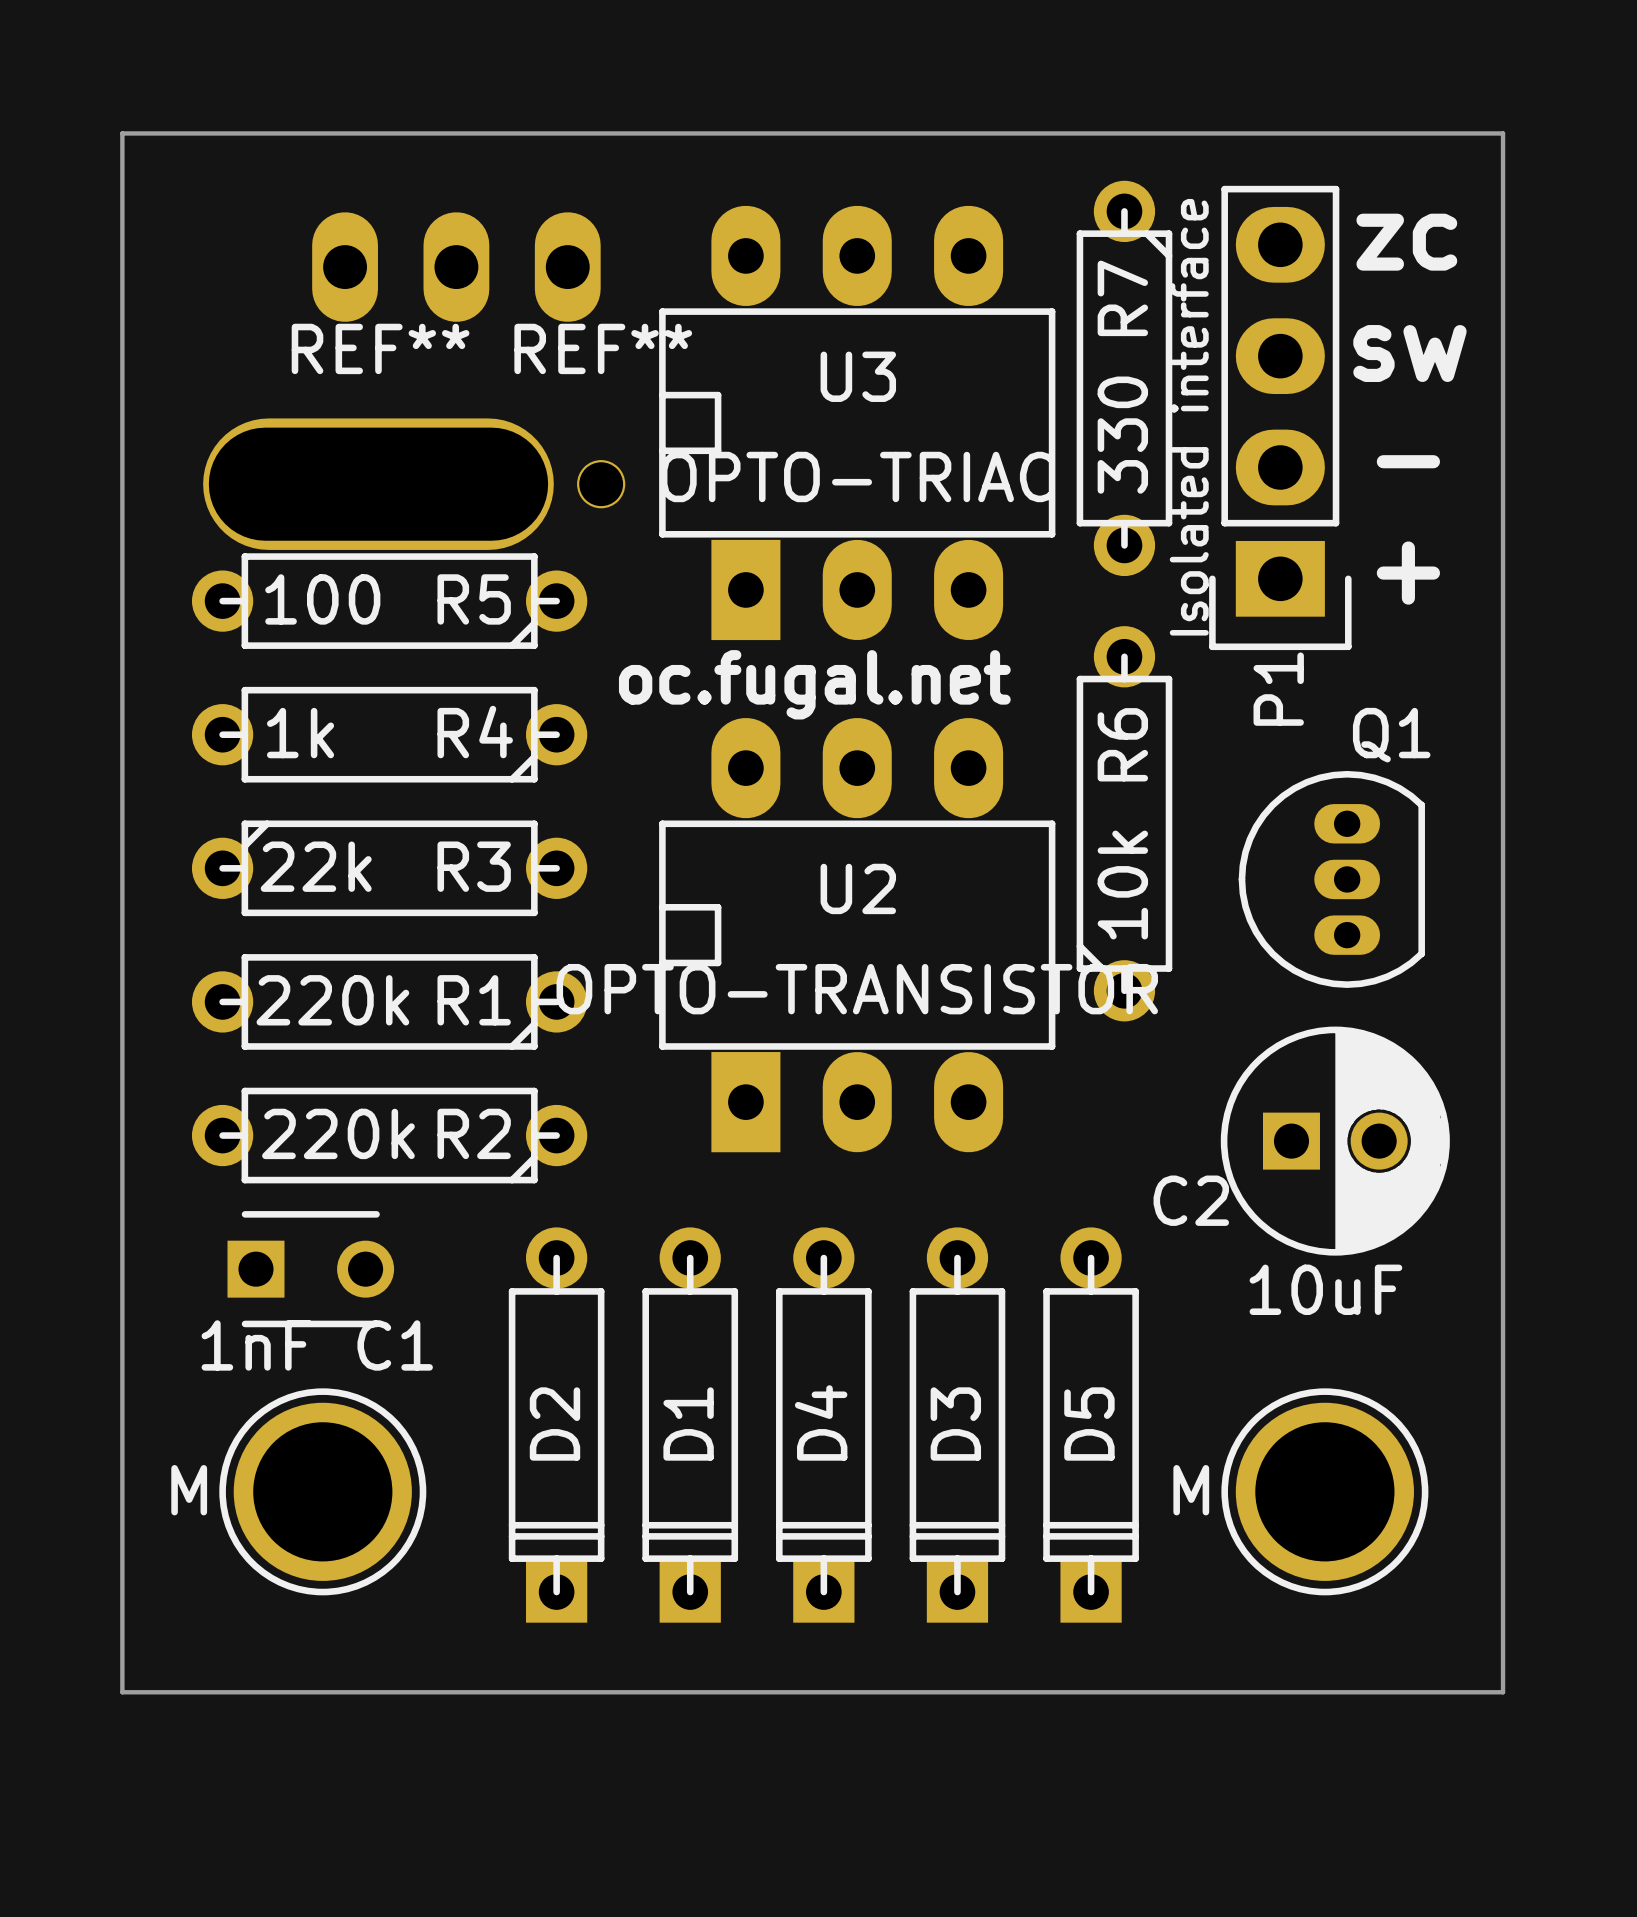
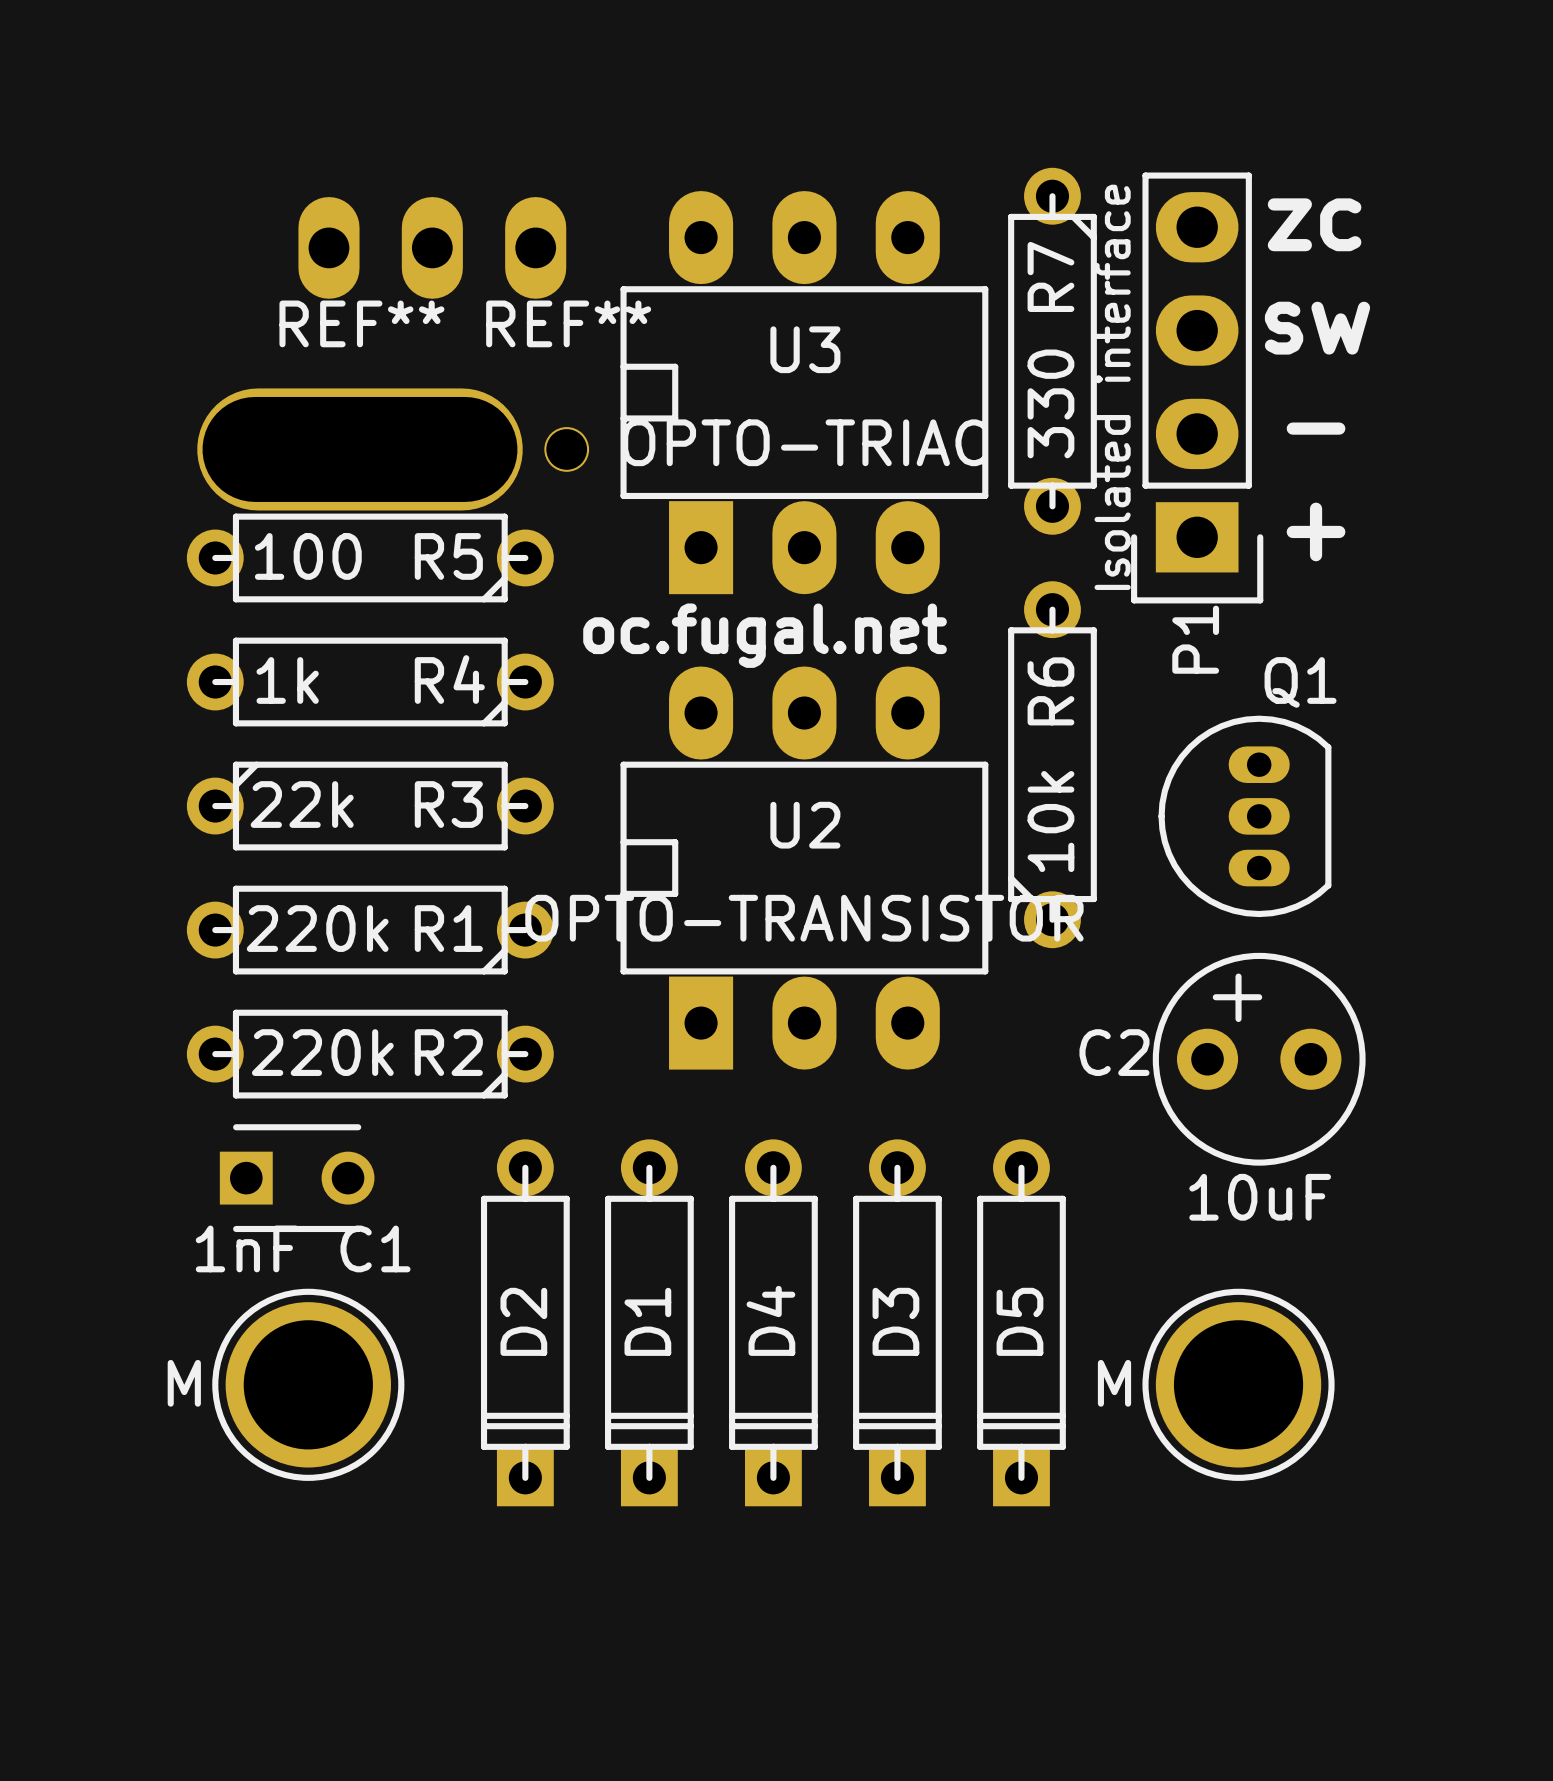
board edge: (122, 133) (1503, 133) (1503, 1692) (122, 1692) (122, 133) -> none
C2 footprint: [1220, 1026, 1450, 1256] -> [1152, 952, 1366, 1166]

